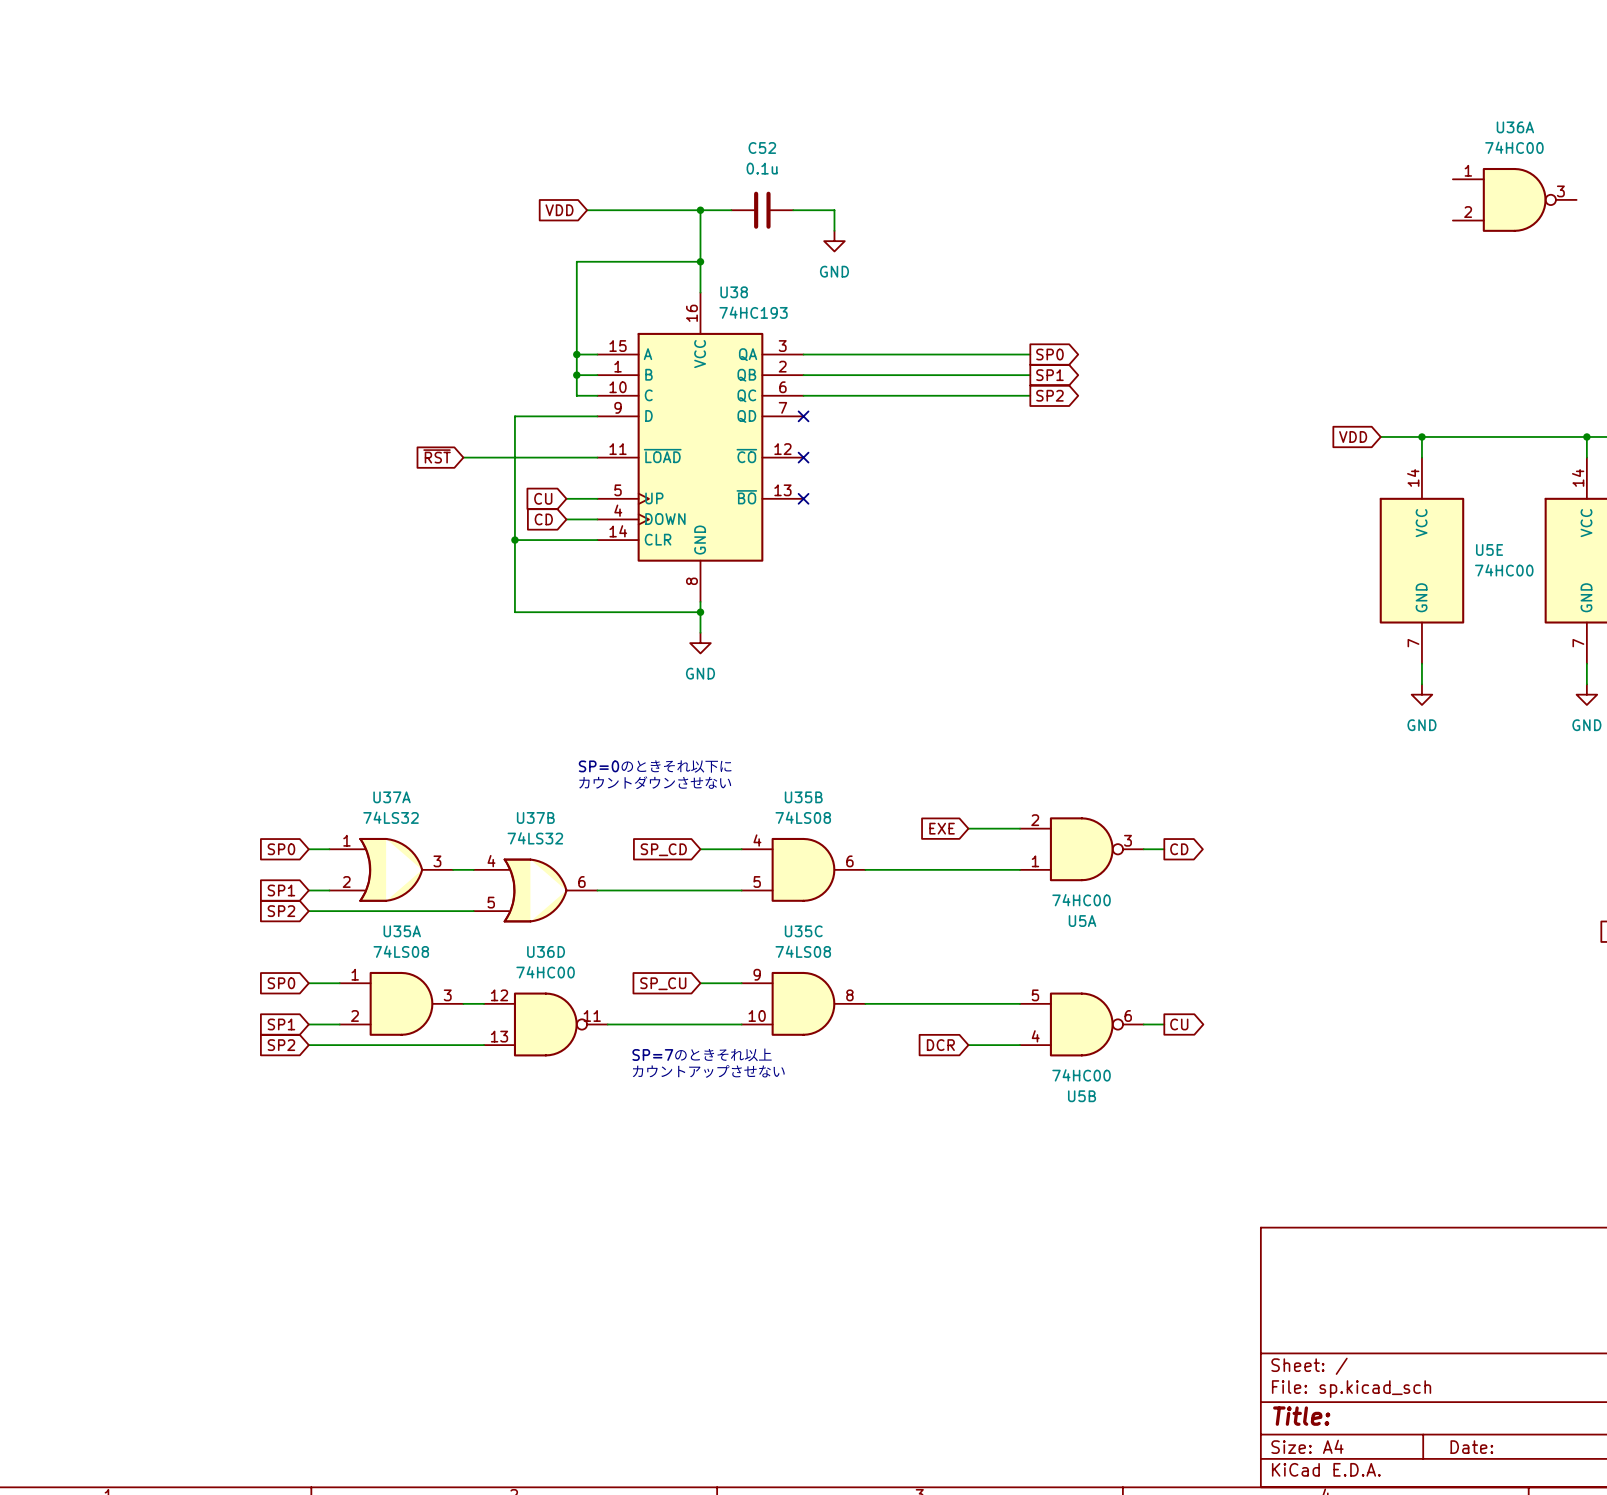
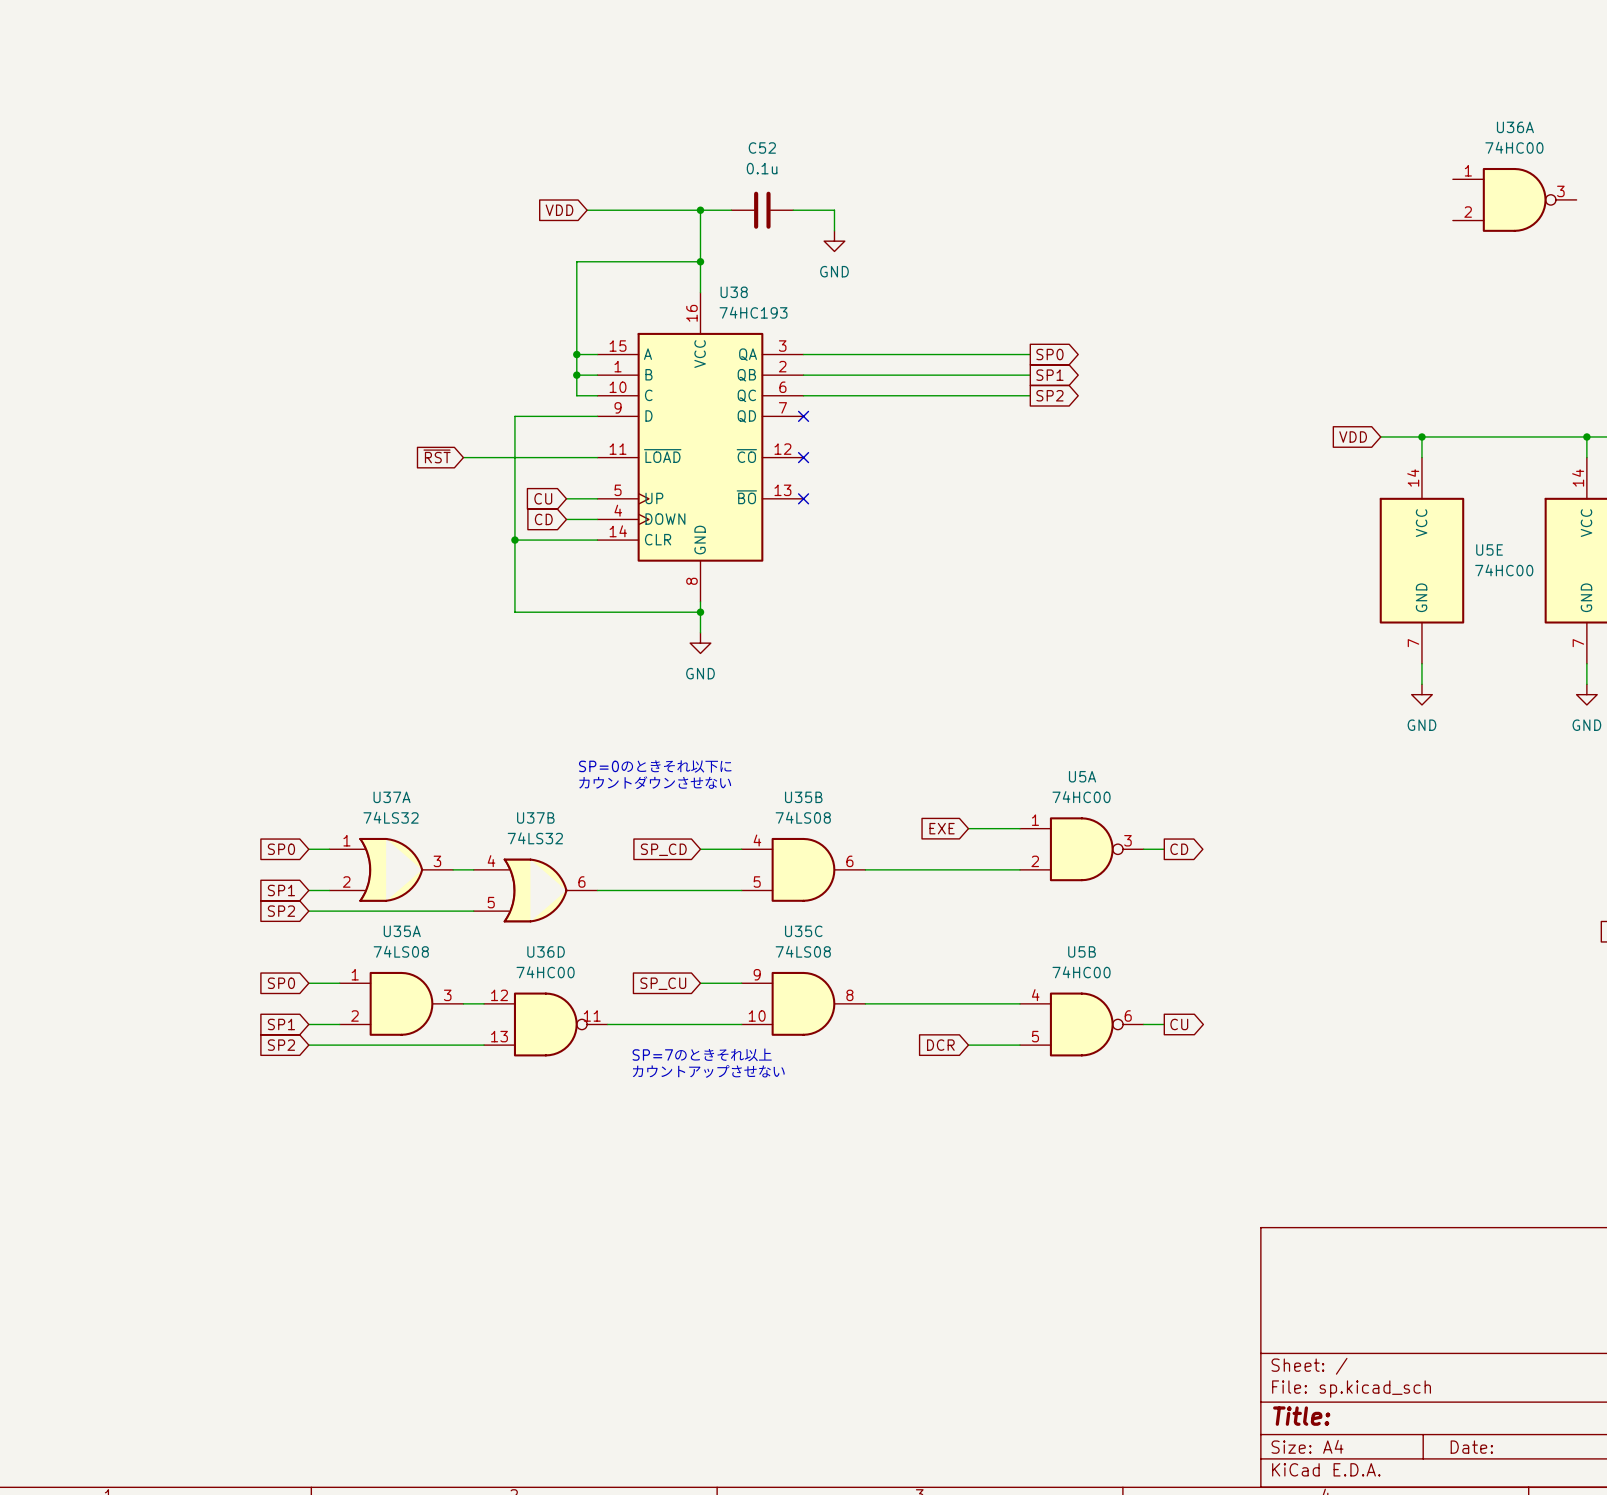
U5A flip: as is (1081, 849) -> up-down (1081, 849)
U5B flip: as is (1081, 1024) -> up-down (1081, 1024)

